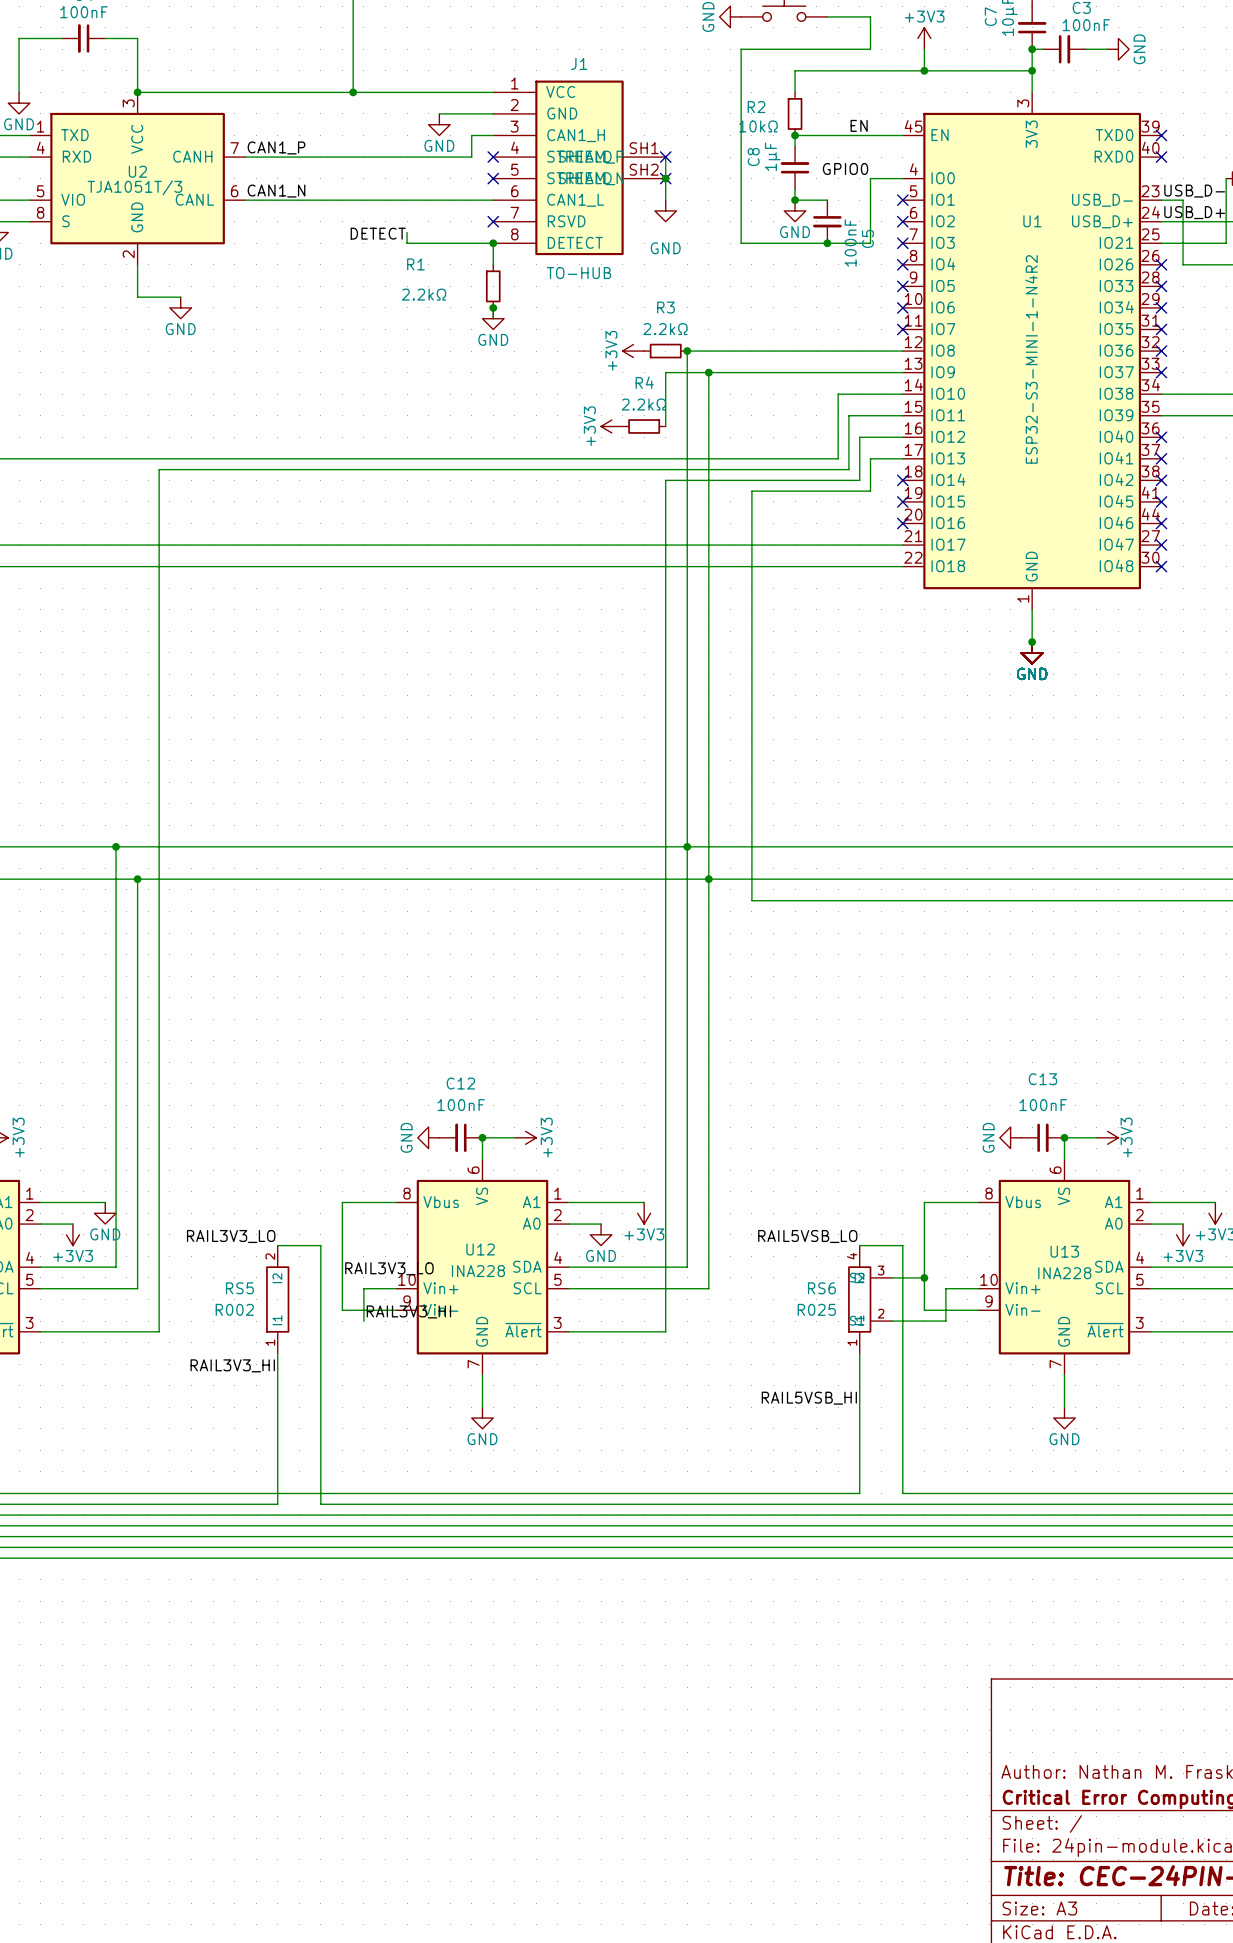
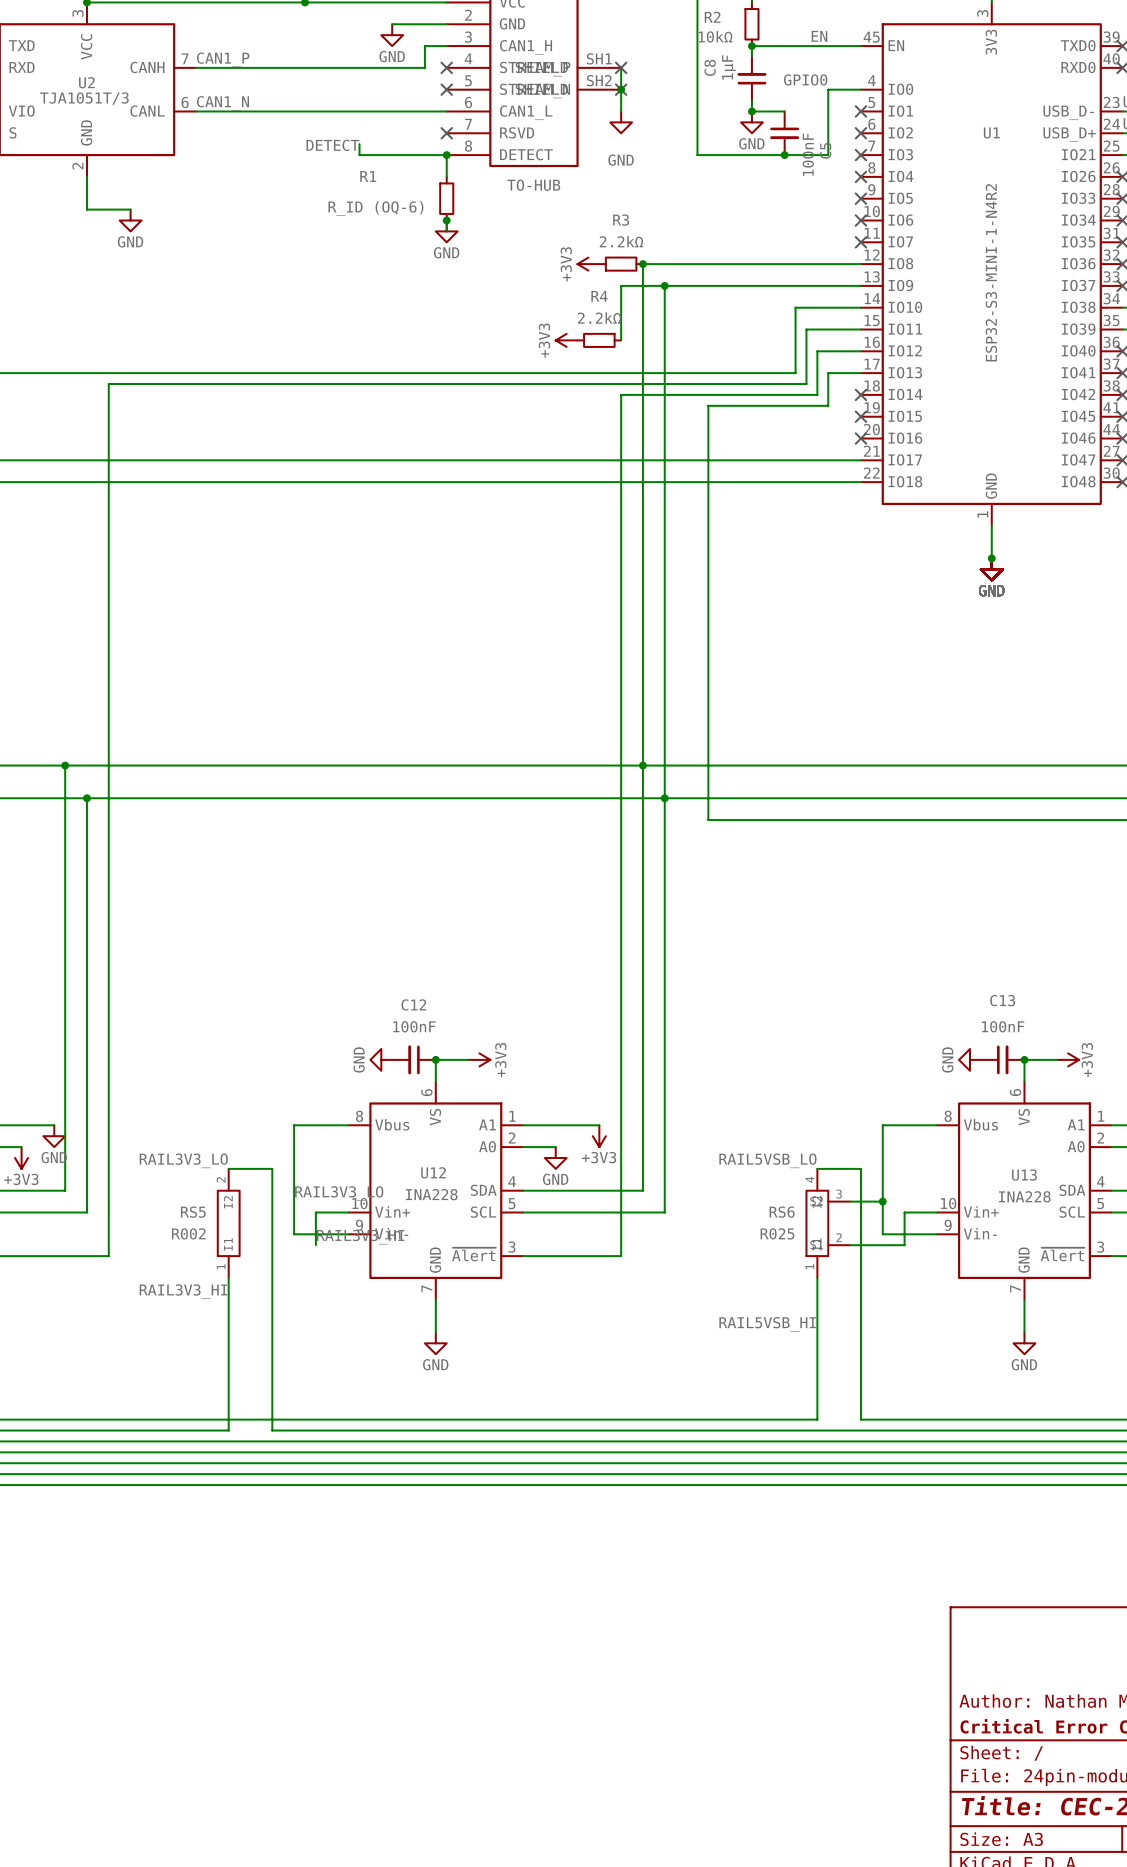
R1 value: 2.2kΩ (424, 294) -> R_ID (OQ-6) (375, 208)

